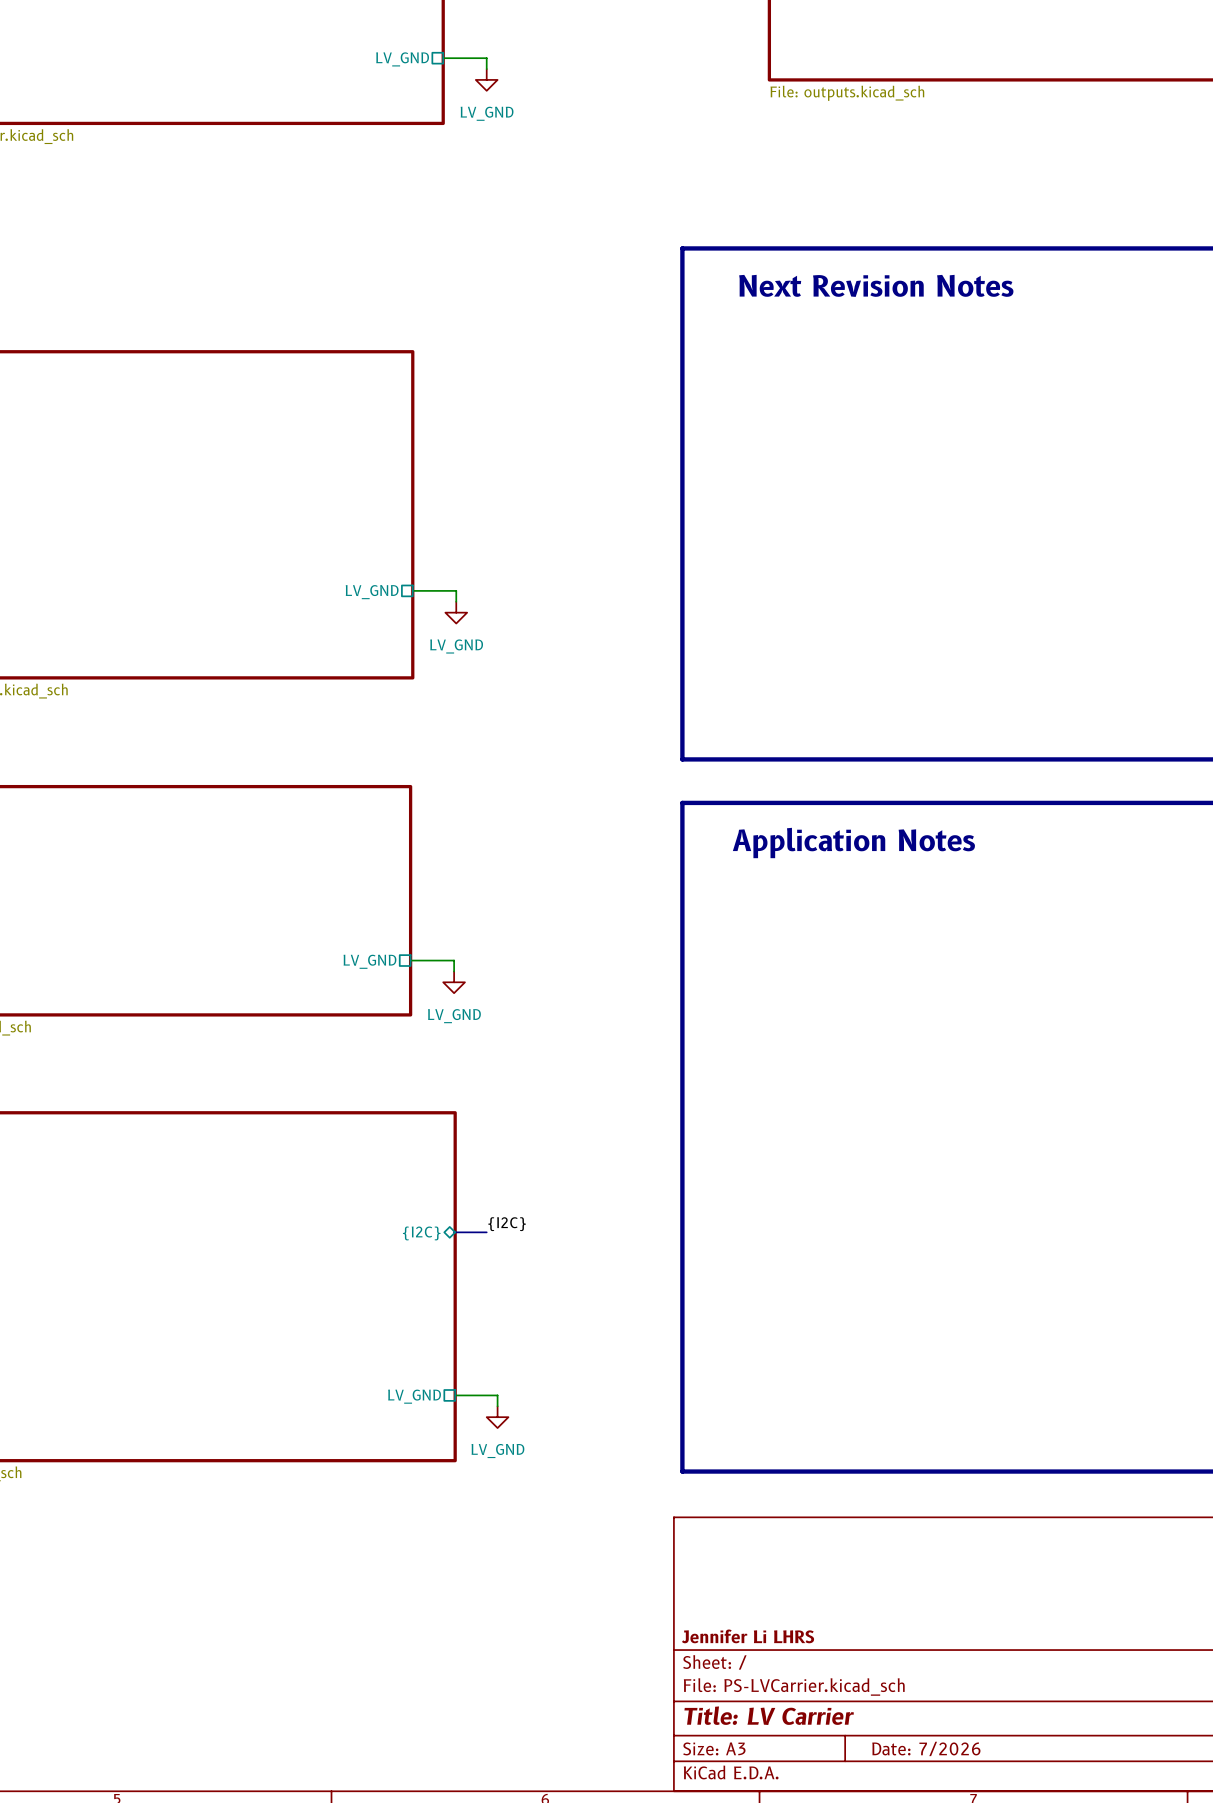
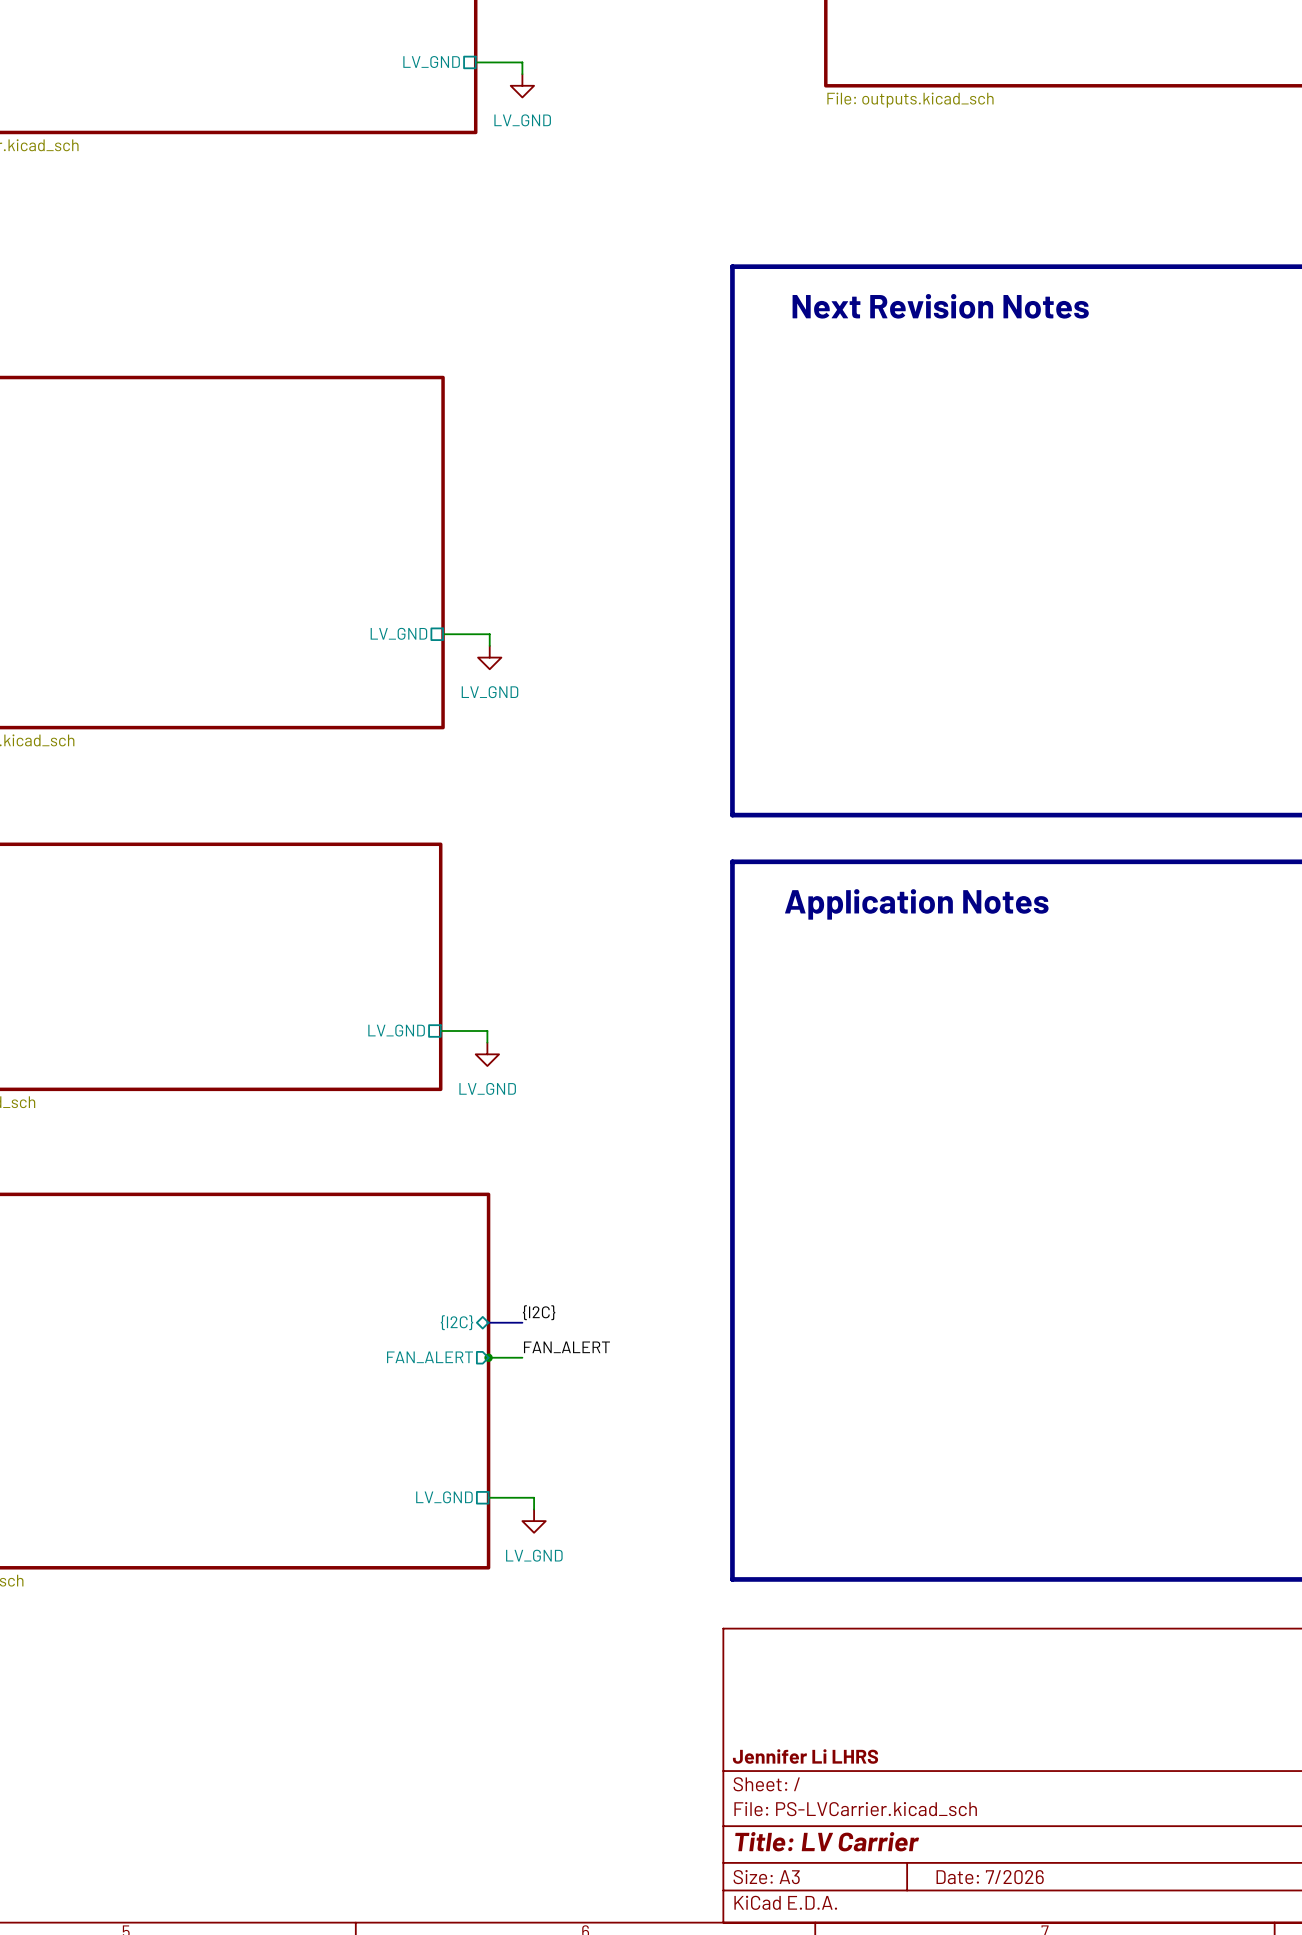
label: none -> FAN_ALERT (566, 1347)
wire: none -> (487, 1357) (522, 1357)
junction: none -> (488, 1357)
sheet pin: none -> FAN_ALERT (430, 1357)

